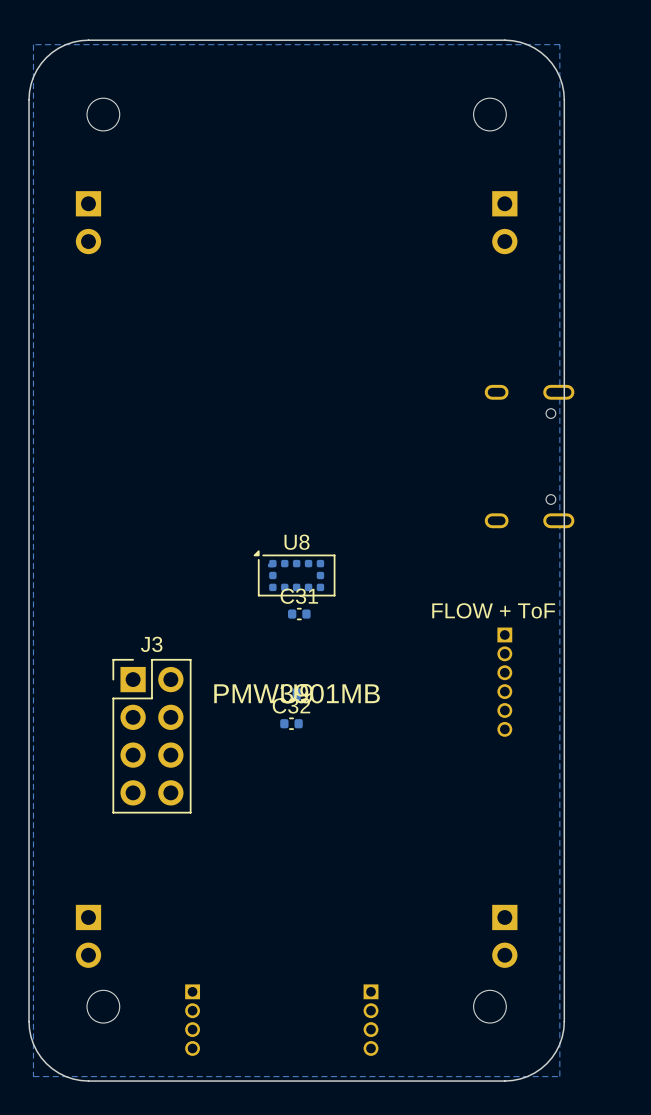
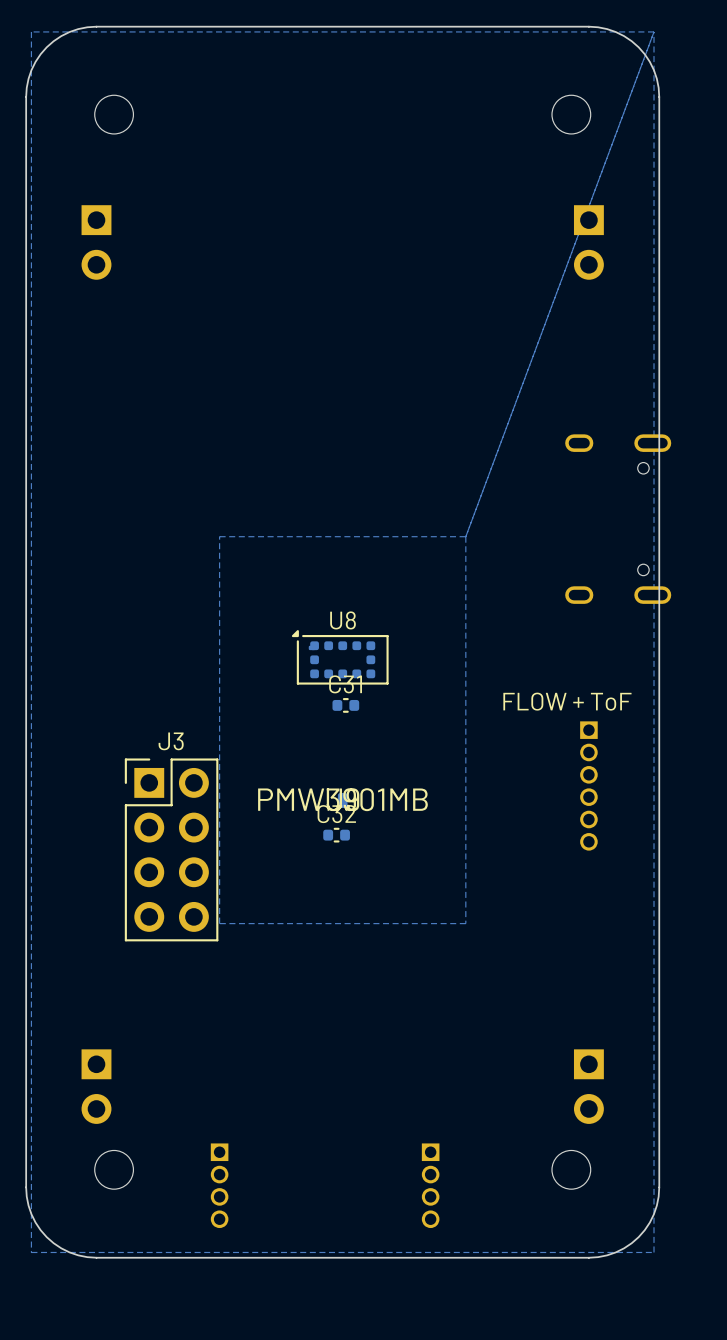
zone outline: none -> (654, 31) (465, 536)
zone outline: none -> (465, 536) (465, 923) (219, 923) (219, 536) (465, 536)

